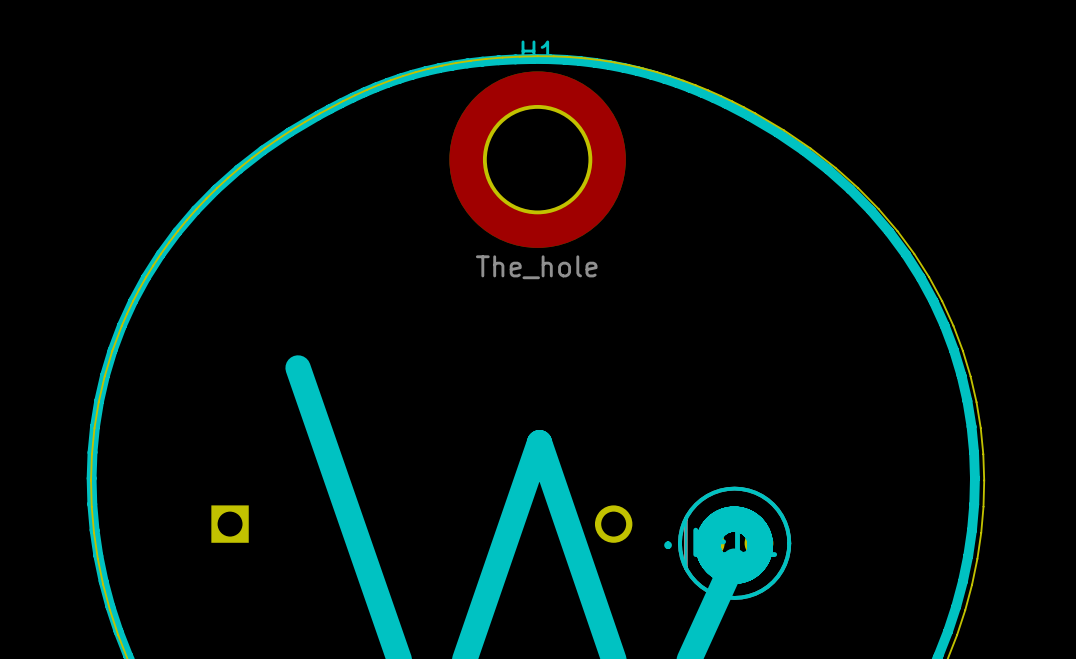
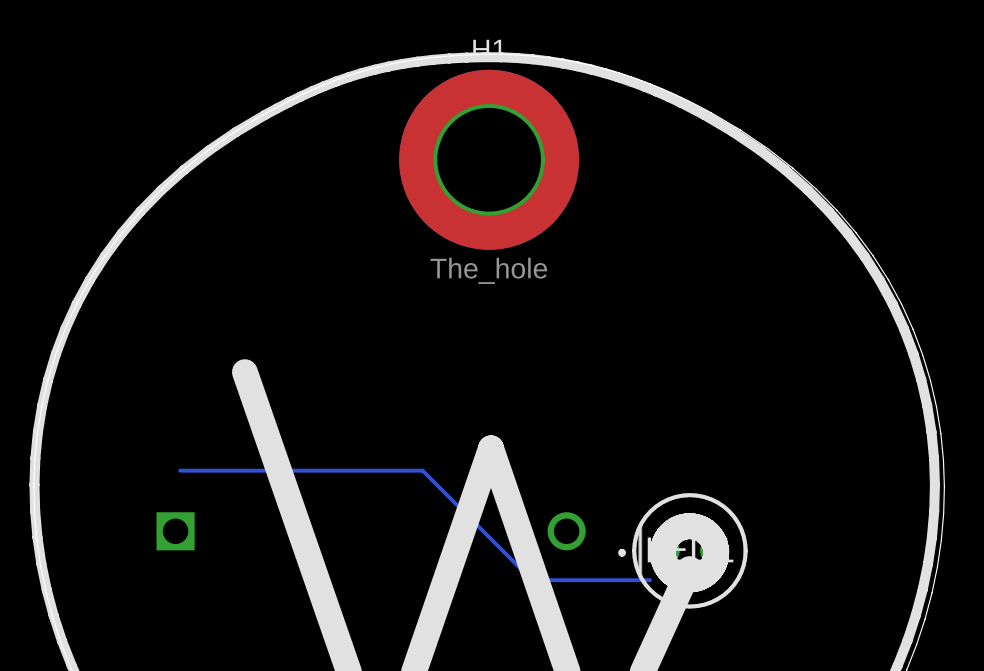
bottom track: none -> (180, 470) (422, 470) (532, 580) (650, 580)

